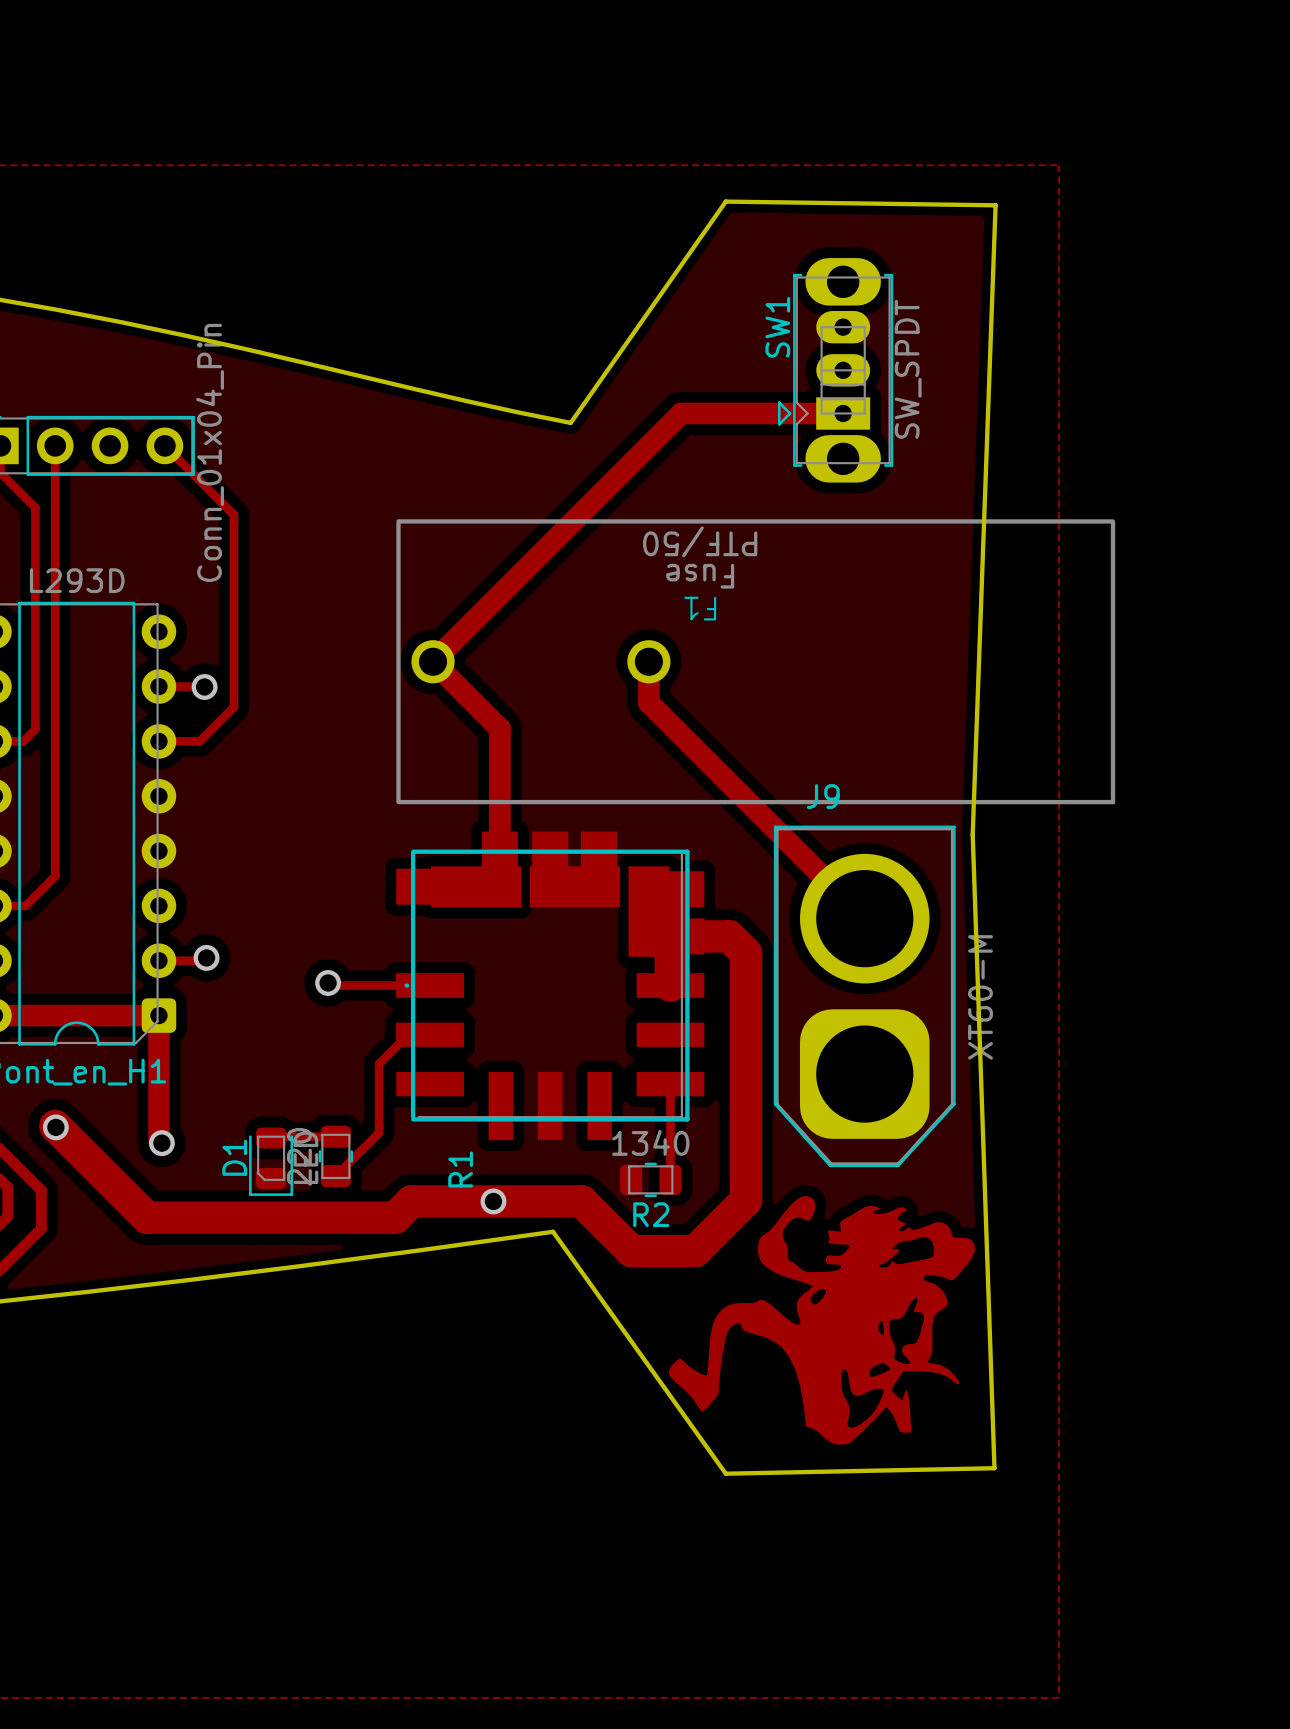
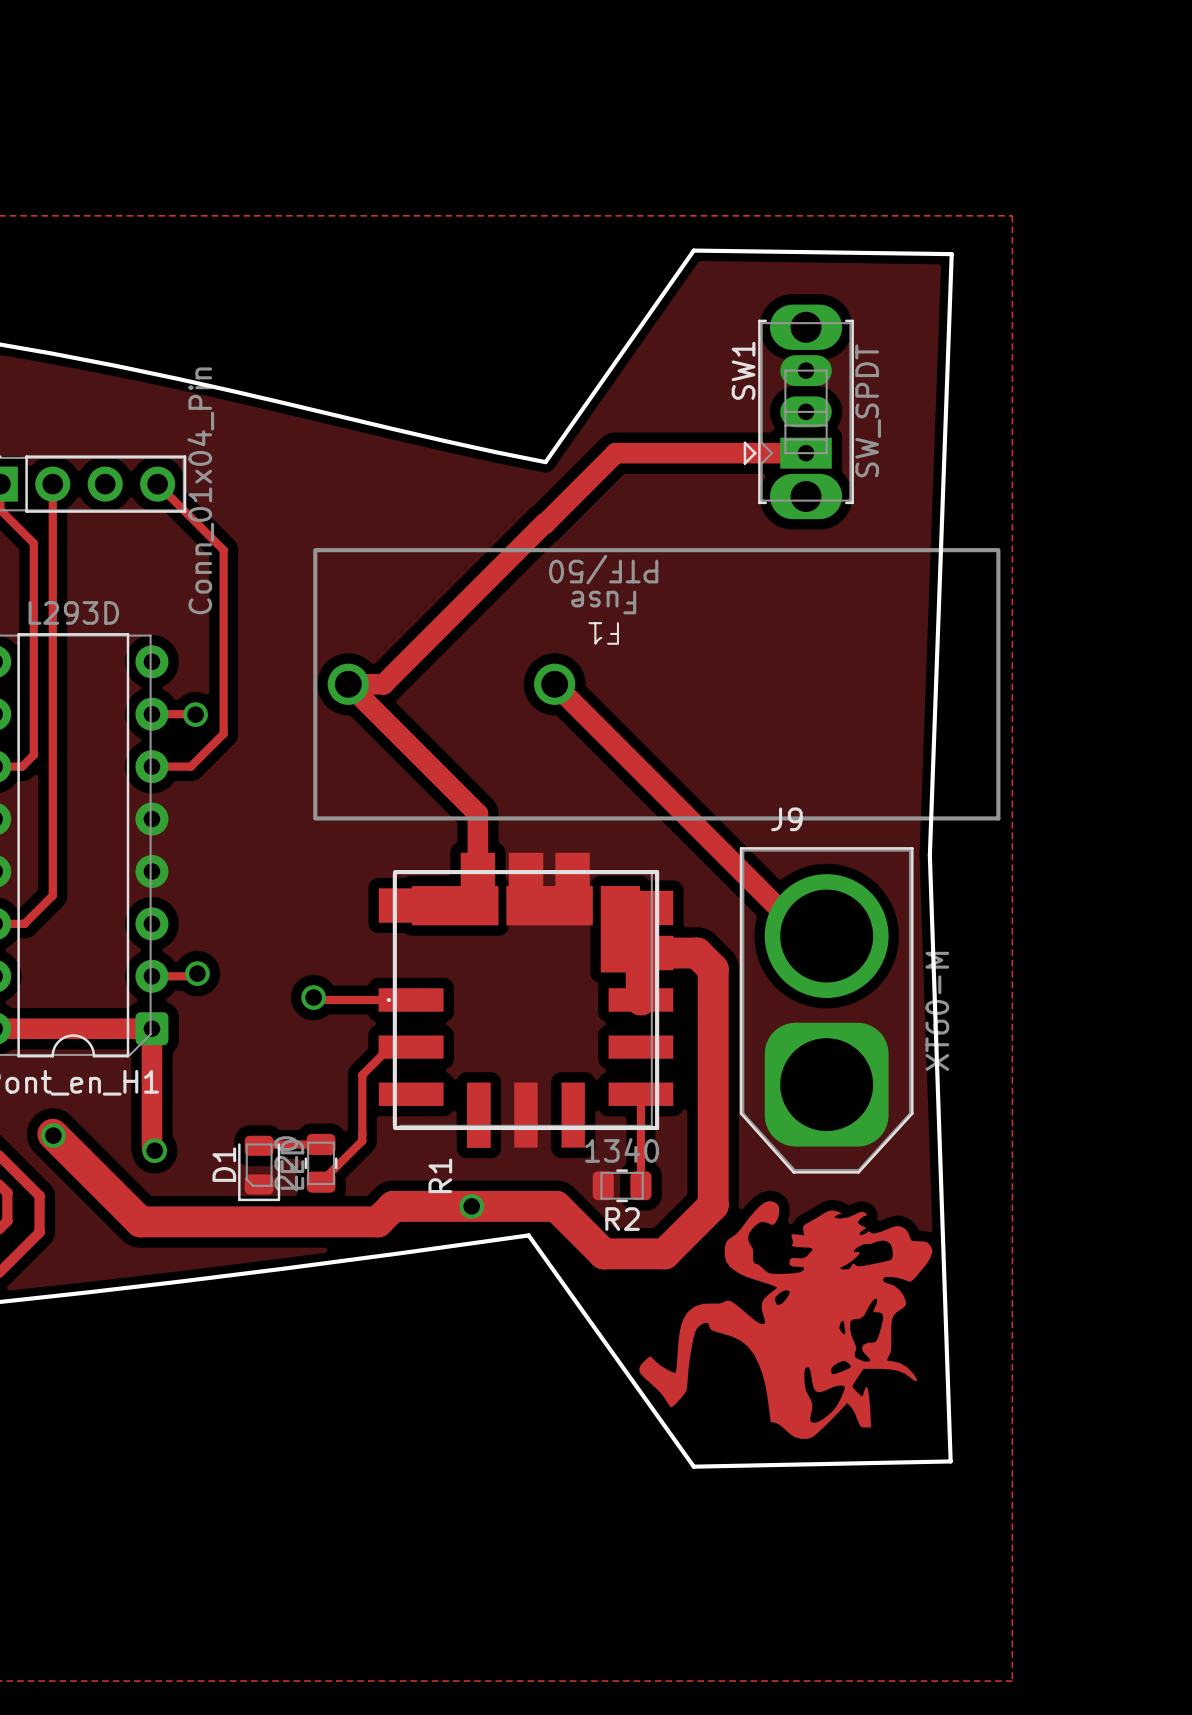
track: (681, 413) (433, 661) (499, 728) (499, 790) -> (651, 453) (615, 453) (383, 684) (348, 684) (477, 813)
track: (648, 661) (648, 702) (864, 918) -> (554, 684) (806, 936) (826, 936)
F1 position: (755, 661) -> (656, 684)

